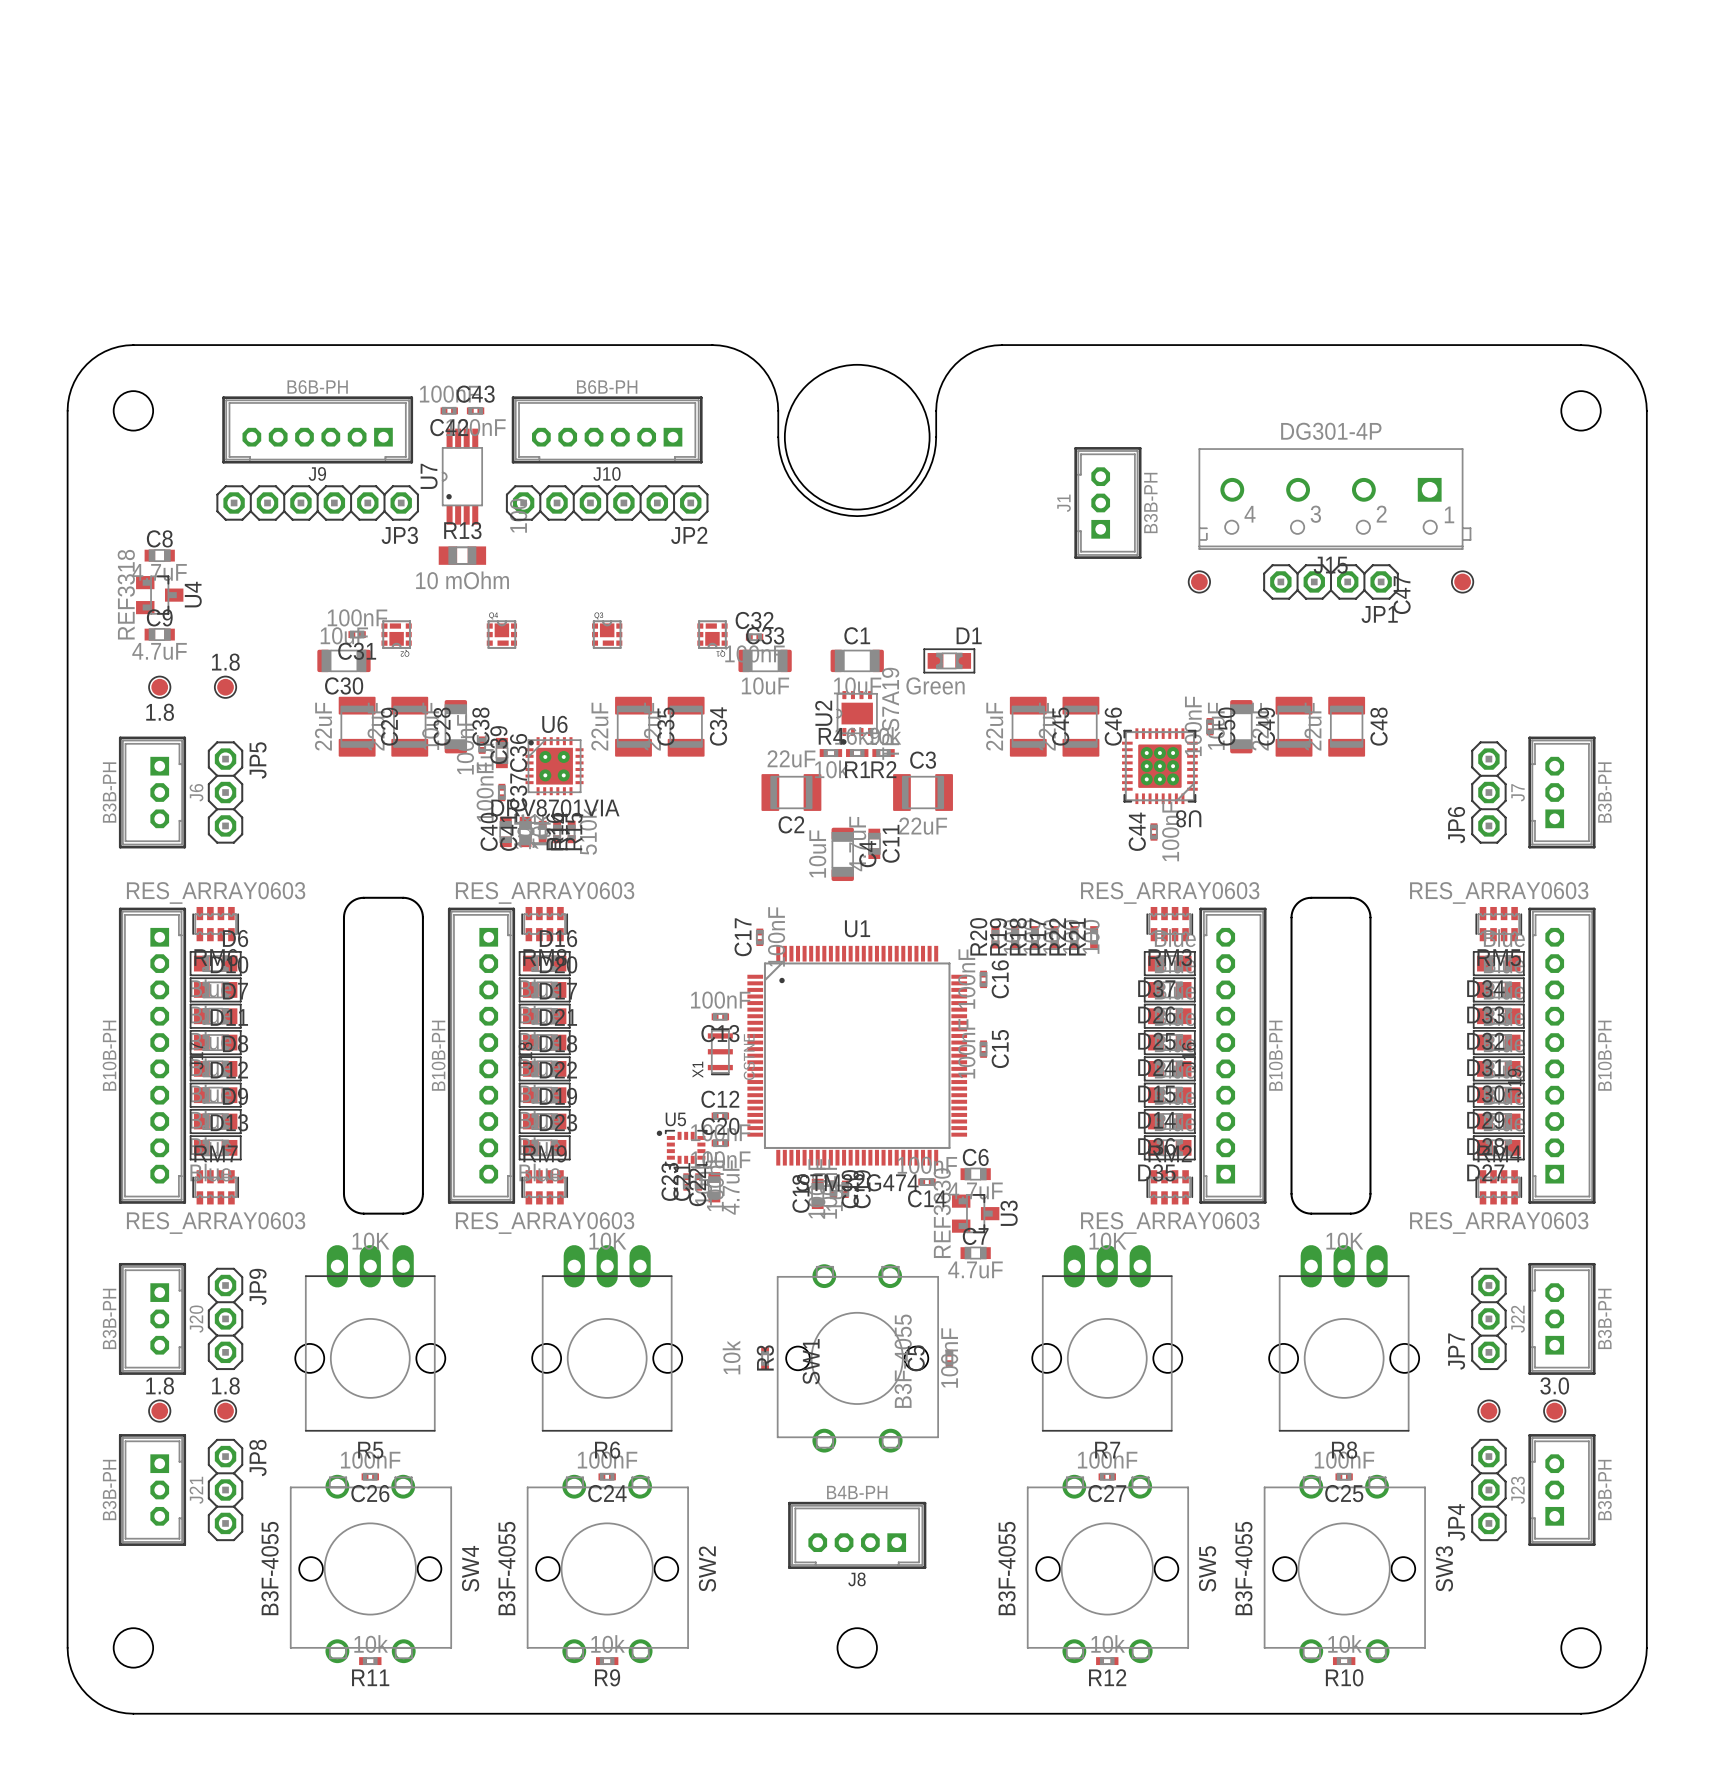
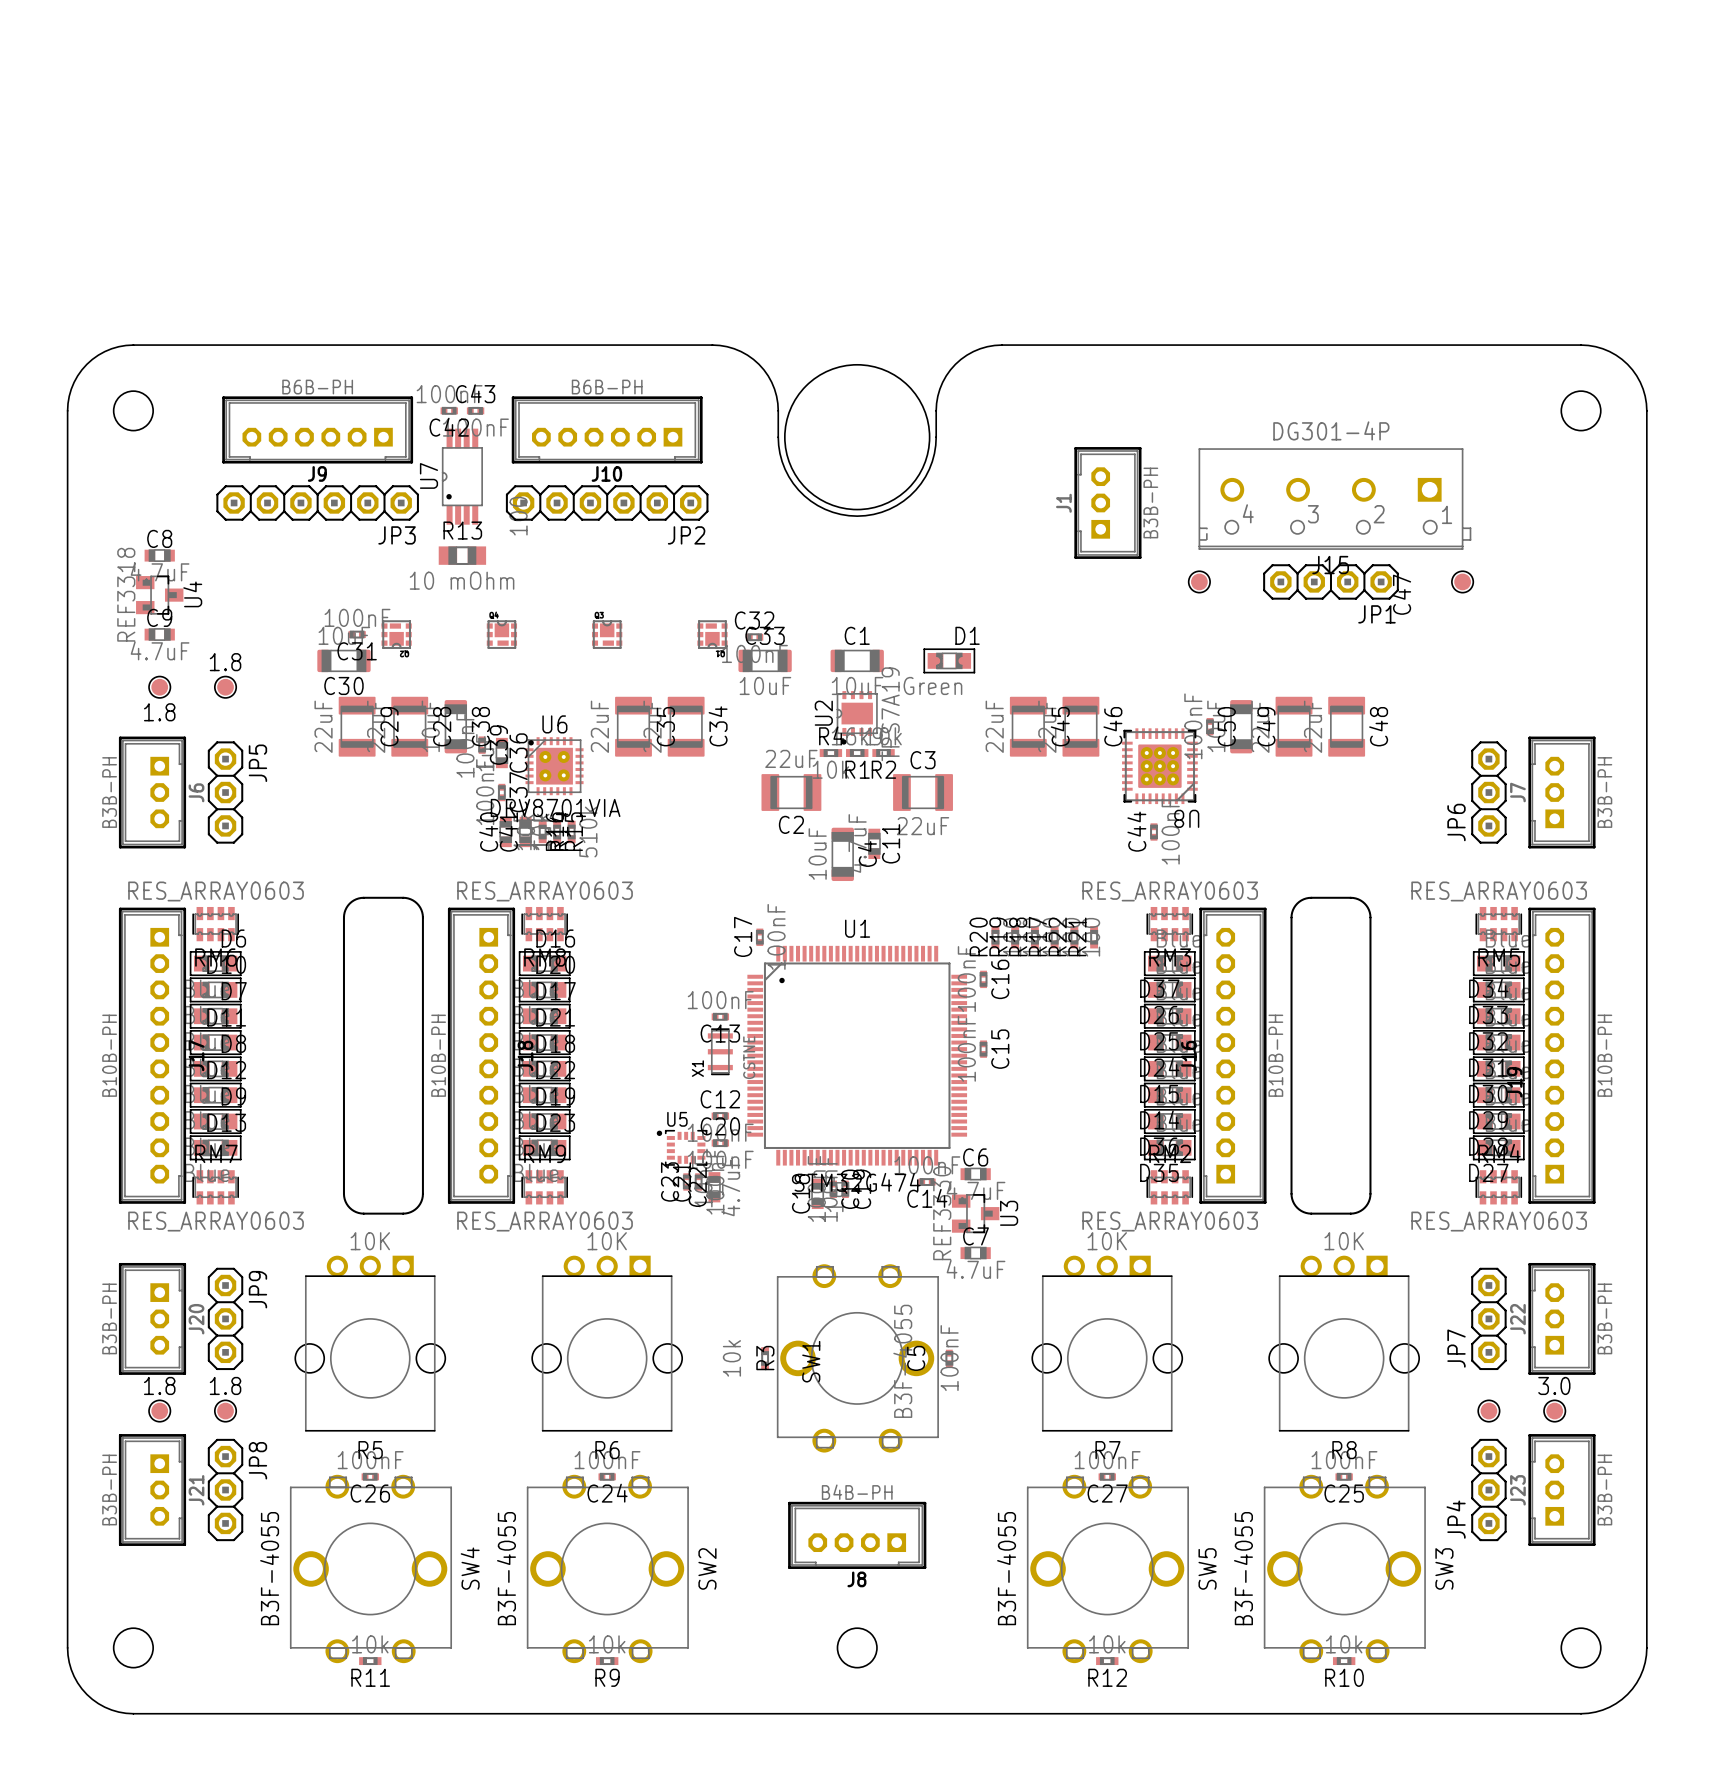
R5 footprint: [295, 1245, 446, 1432] -> [295, 1255, 446, 1432]
R6 footprint: [532, 1245, 683, 1432] -> [532, 1255, 683, 1432]
R7 footprint: [1032, 1245, 1183, 1432] -> [1032, 1255, 1183, 1432]
R8 footprint: [1269, 1245, 1420, 1432] -> [1269, 1255, 1420, 1432]
SW1 footprint: [776, 1264, 939, 1453] -> [776, 1264, 939, 1453]
SW4 footprint: [289, 1474, 453, 1664] -> [289, 1474, 453, 1664]
SW2 footprint: [526, 1474, 689, 1664] -> [526, 1474, 689, 1664]
SW5 footprint: [1026, 1474, 1190, 1664] -> [1026, 1474, 1190, 1664]
SW3 footprint: [1263, 1474, 1426, 1664] -> [1263, 1474, 1426, 1664]

